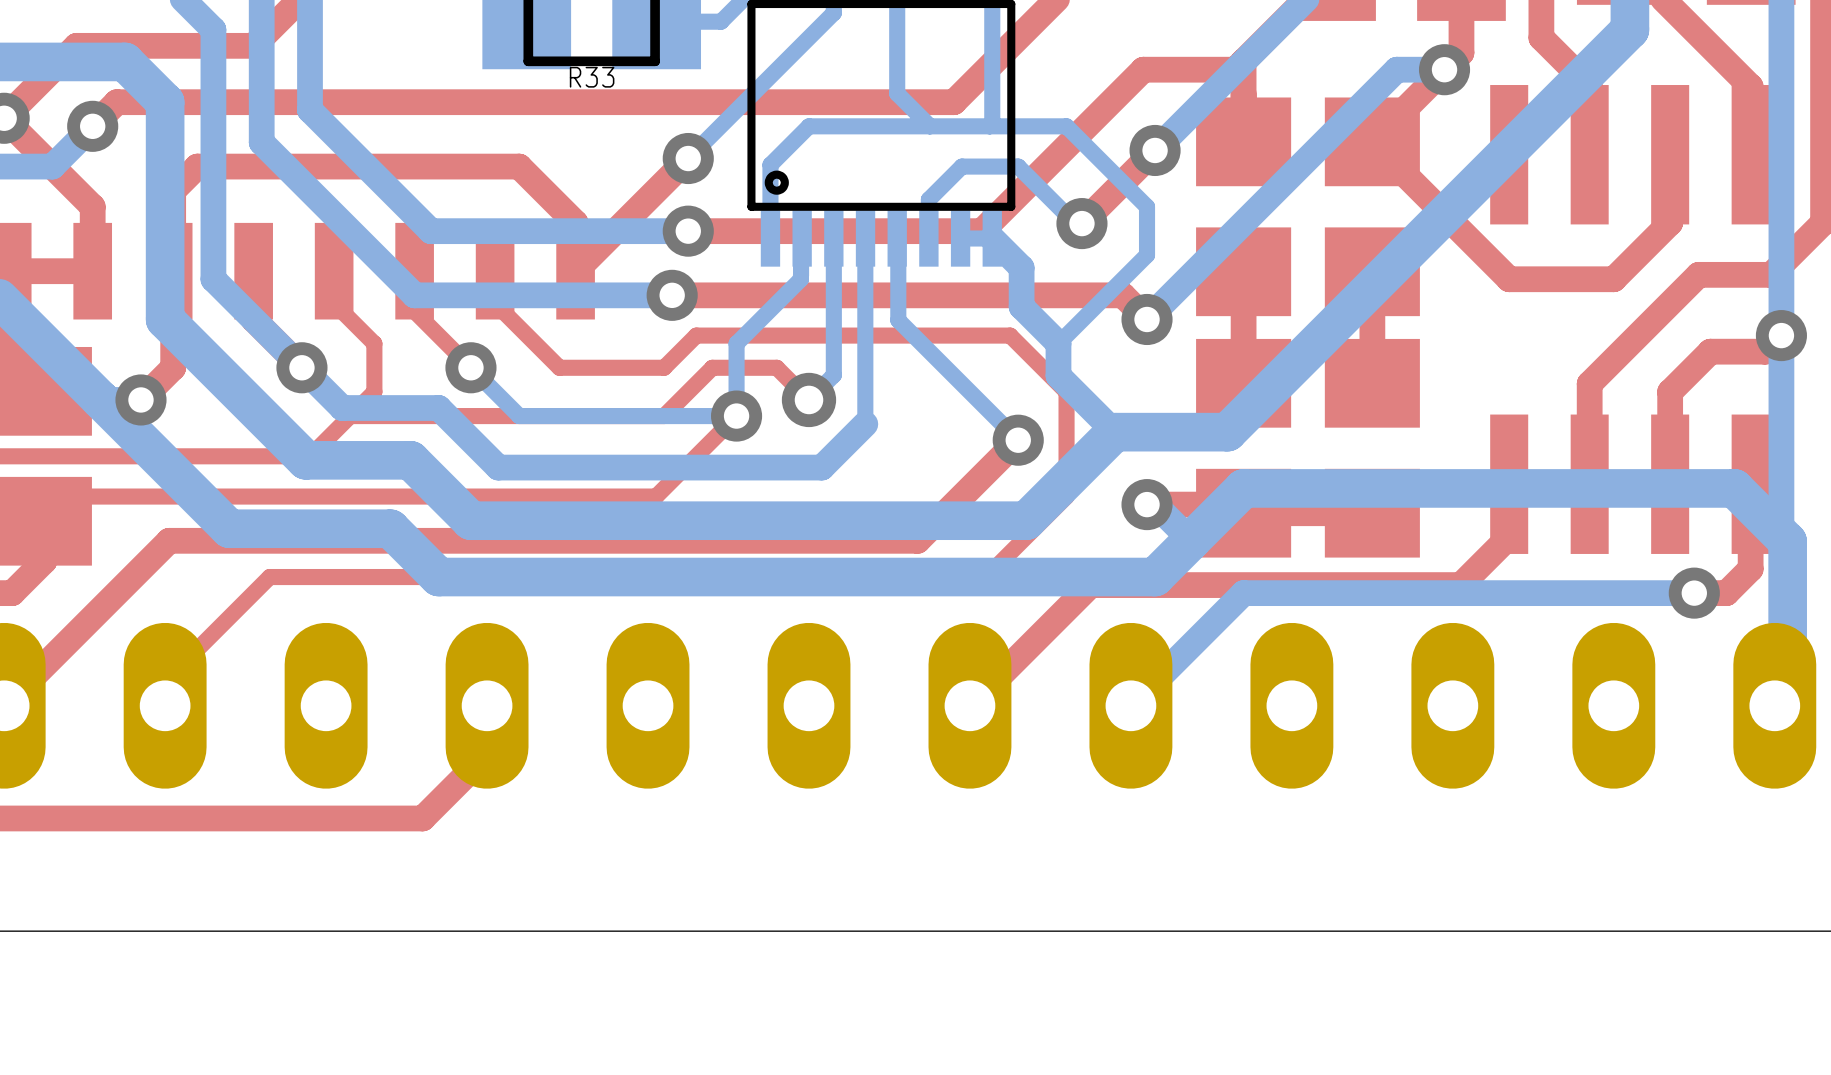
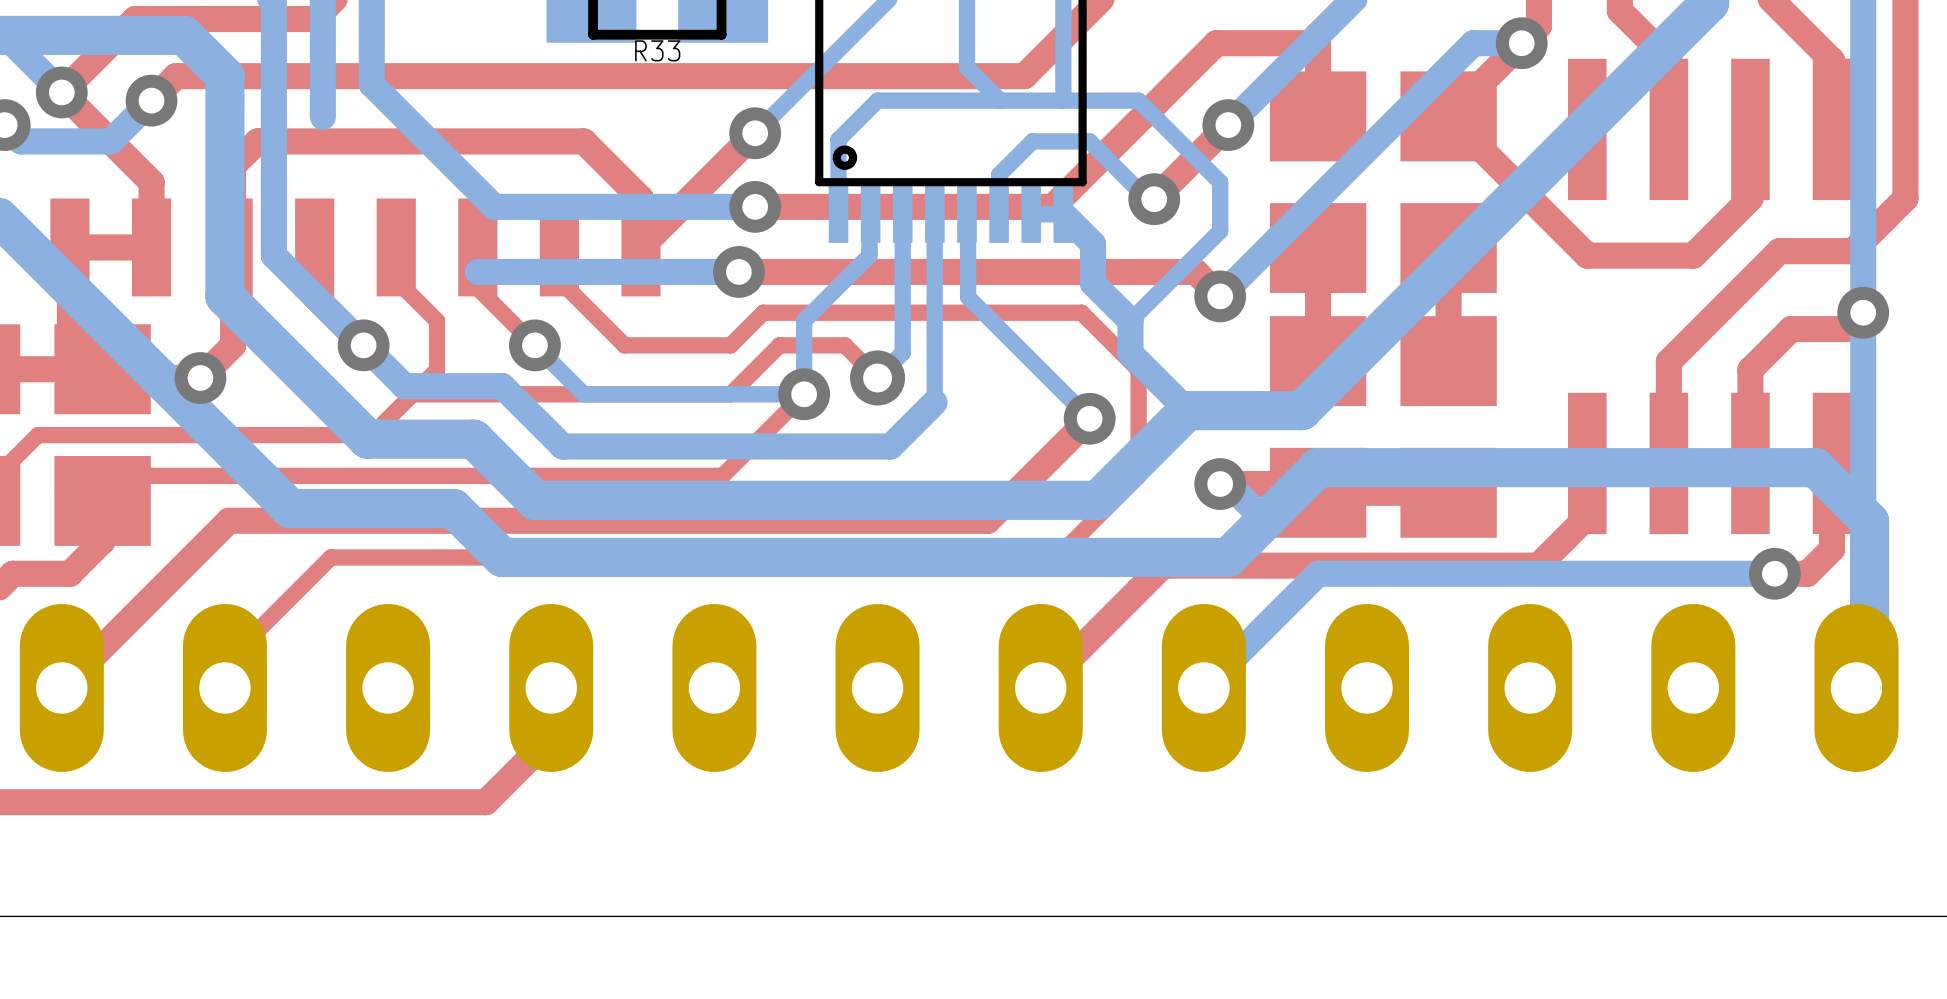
bottom track: (261, 142) (414, 295) -> none

